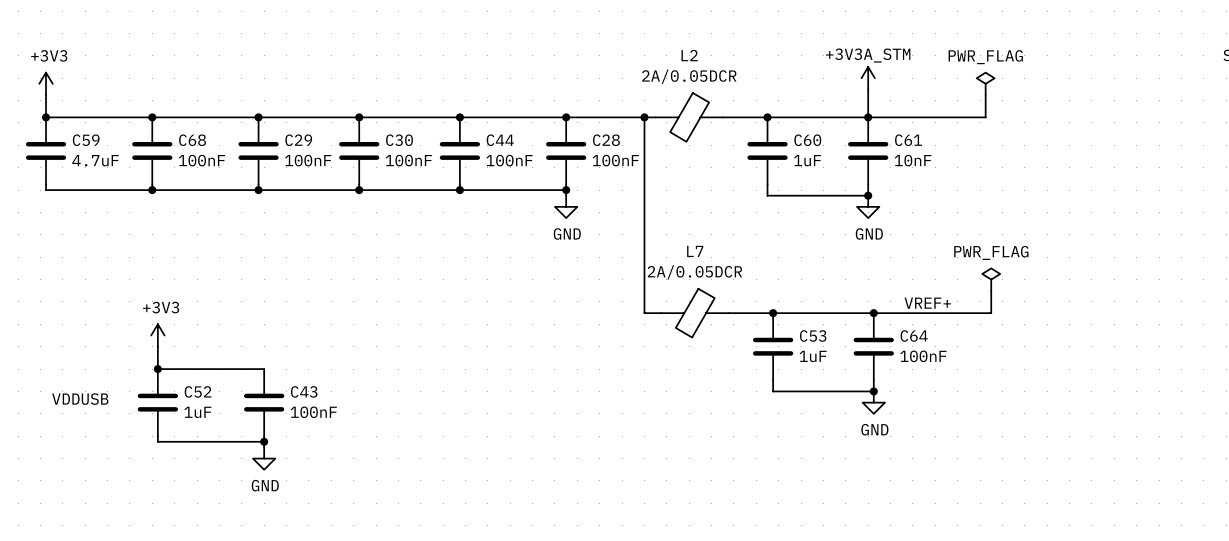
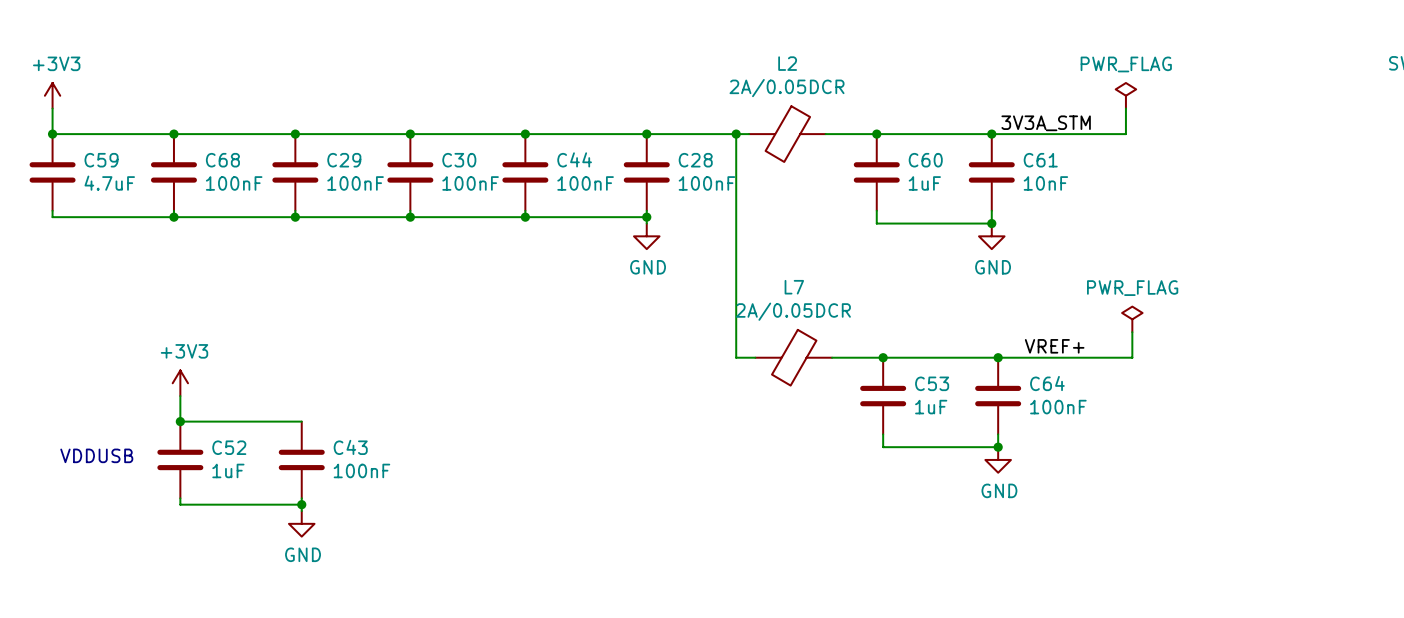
power symbol: +3V3A_STM (868, 78) -> none
wire: (868, 89) (868, 117) -> none
label: none -> 3V3A_STM (1046, 123)

